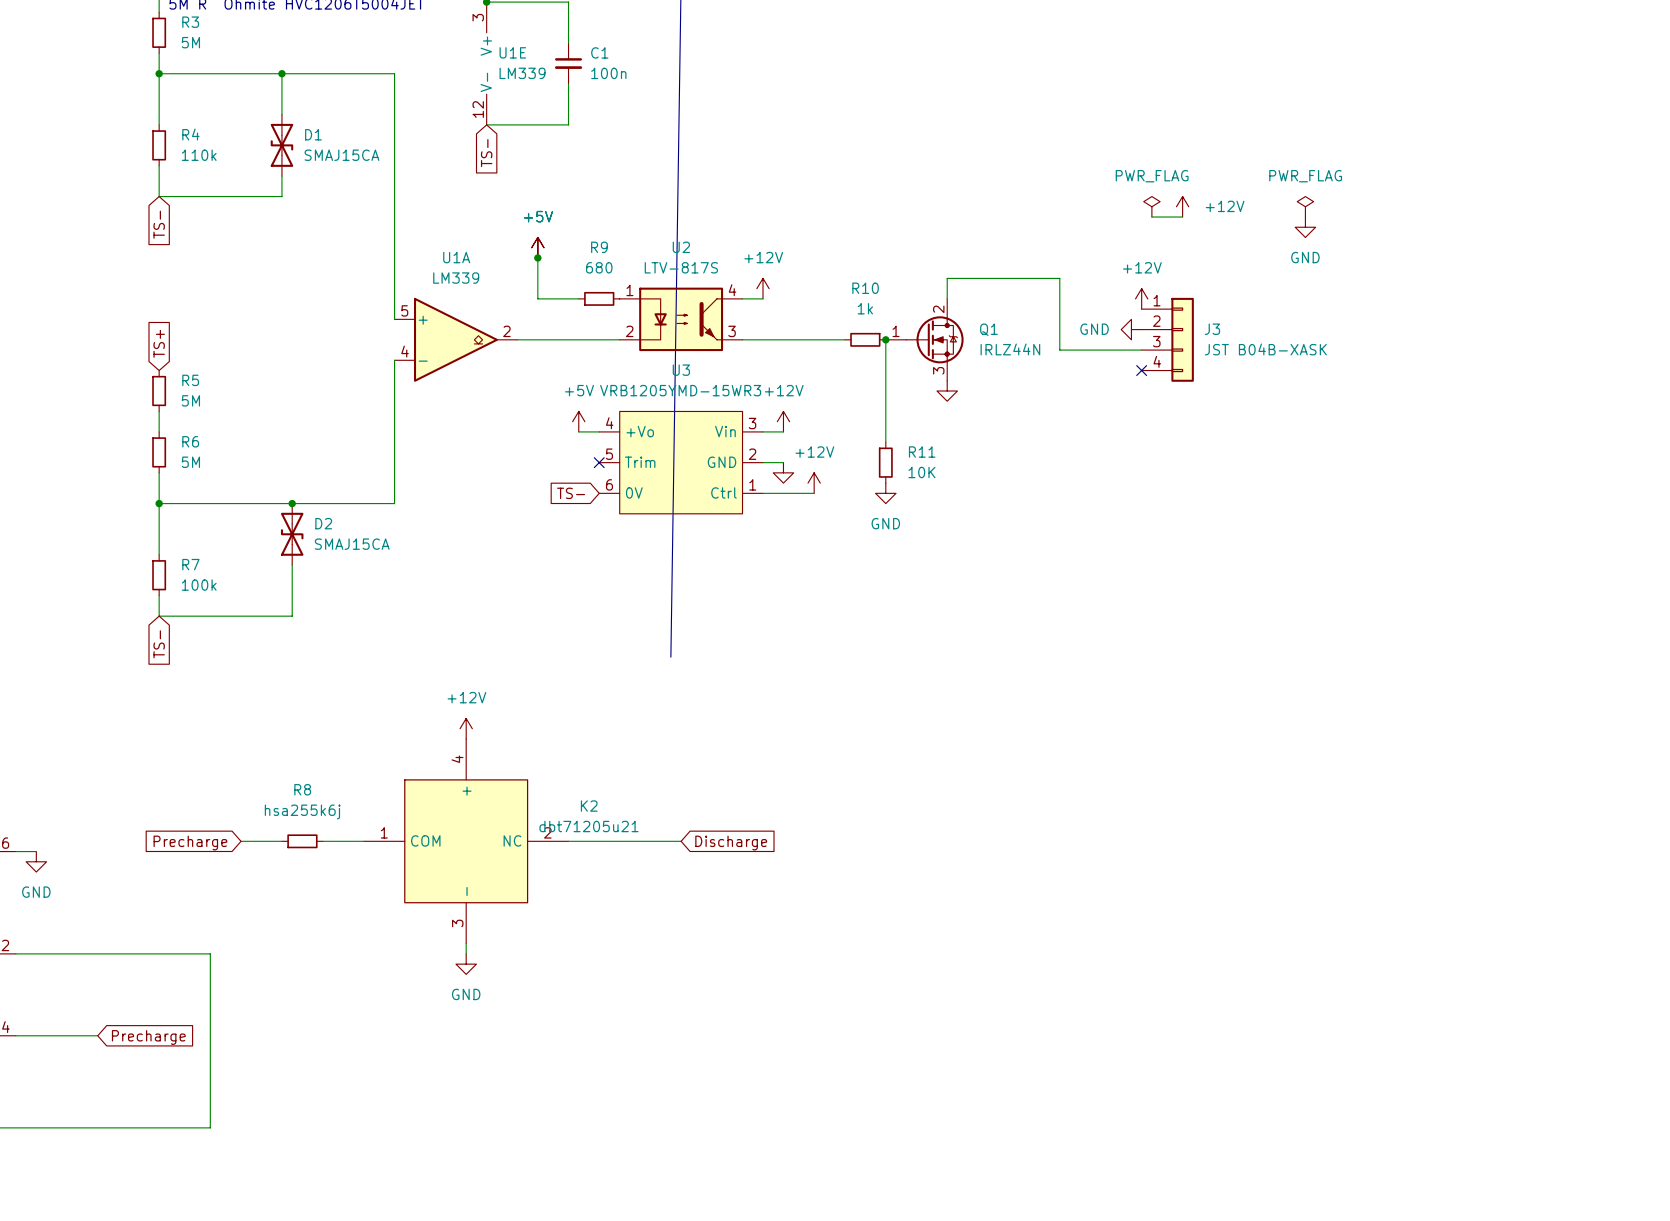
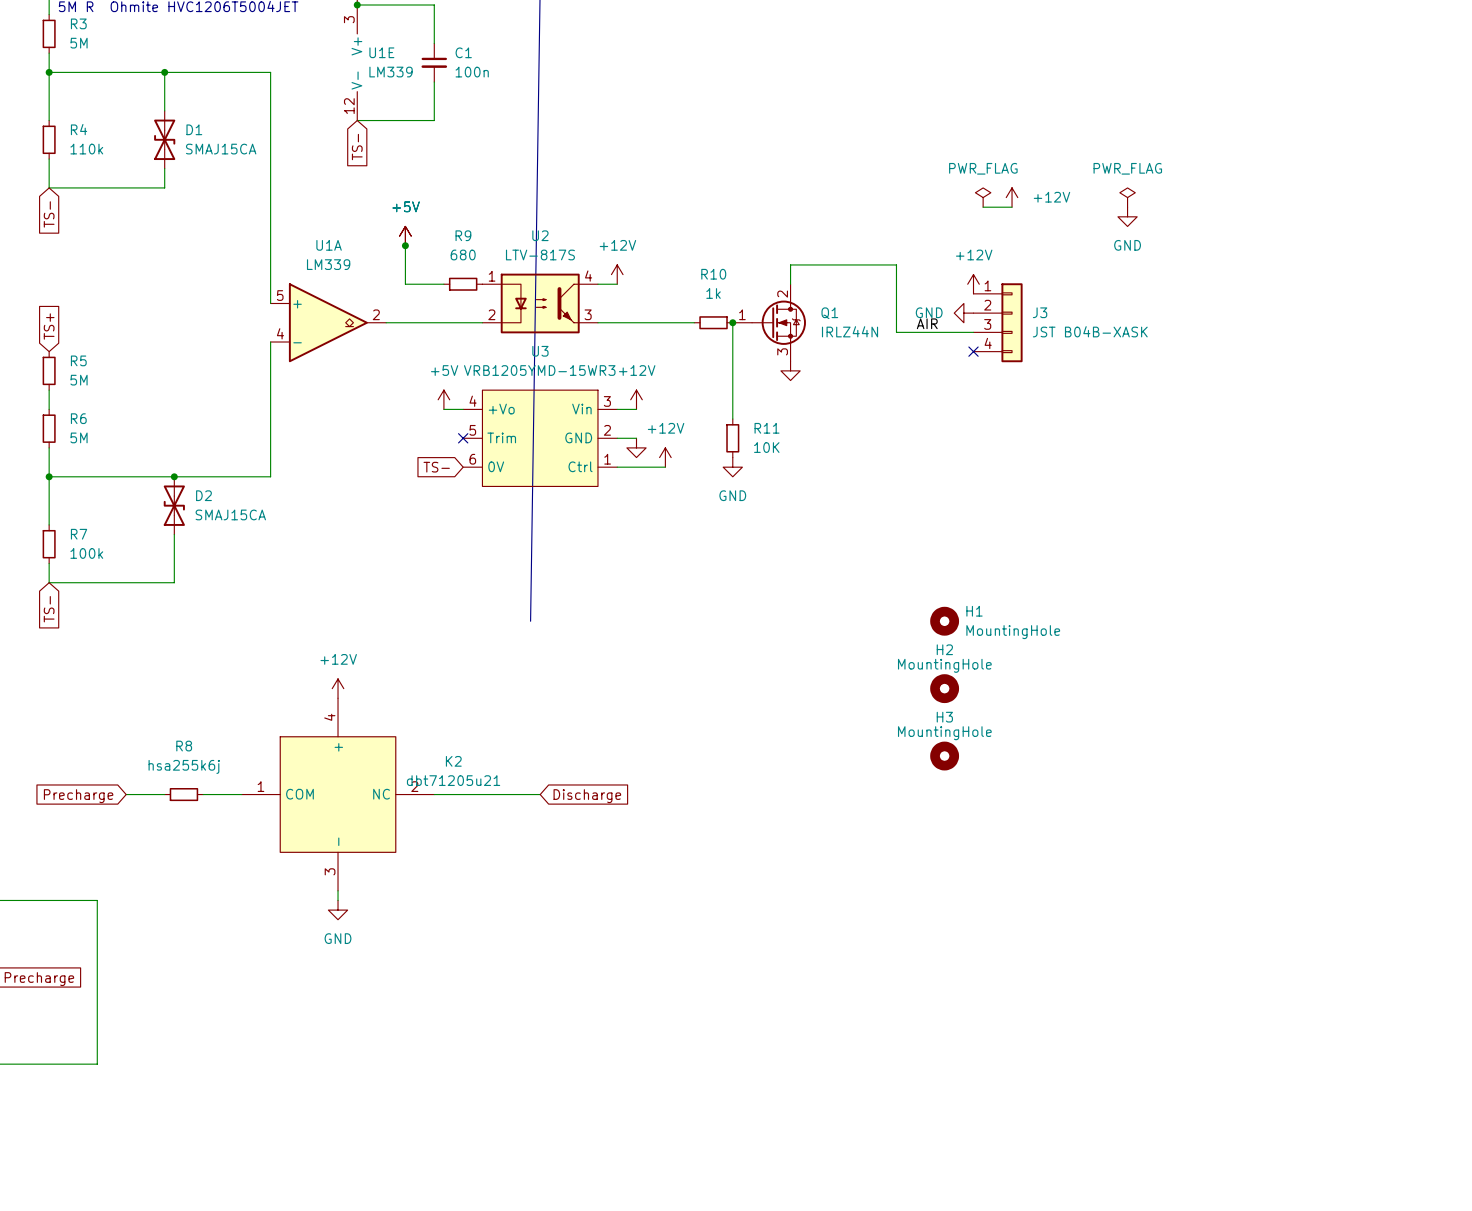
label: none -> AIR (927, 323)
H1: none -> MountingHole (944, 621)
H2: none -> MountingHole (944, 688)
H3: none -> MountingHole (944, 756)

